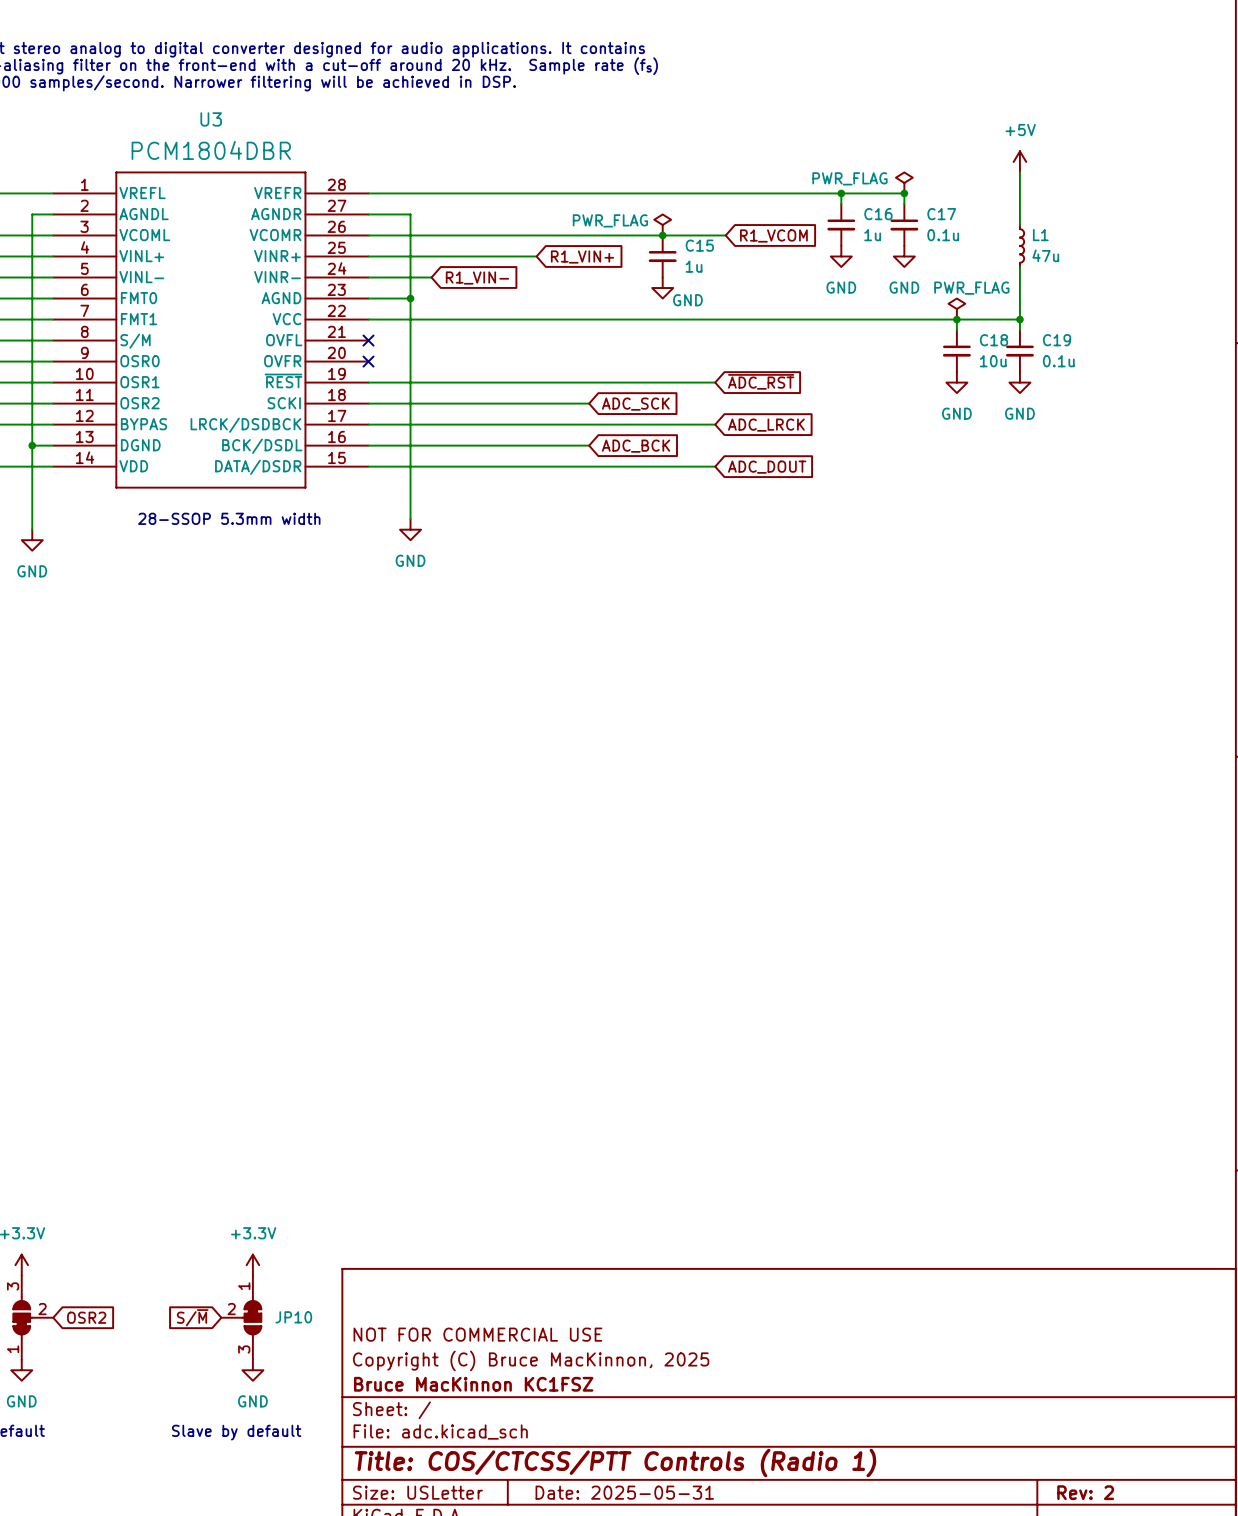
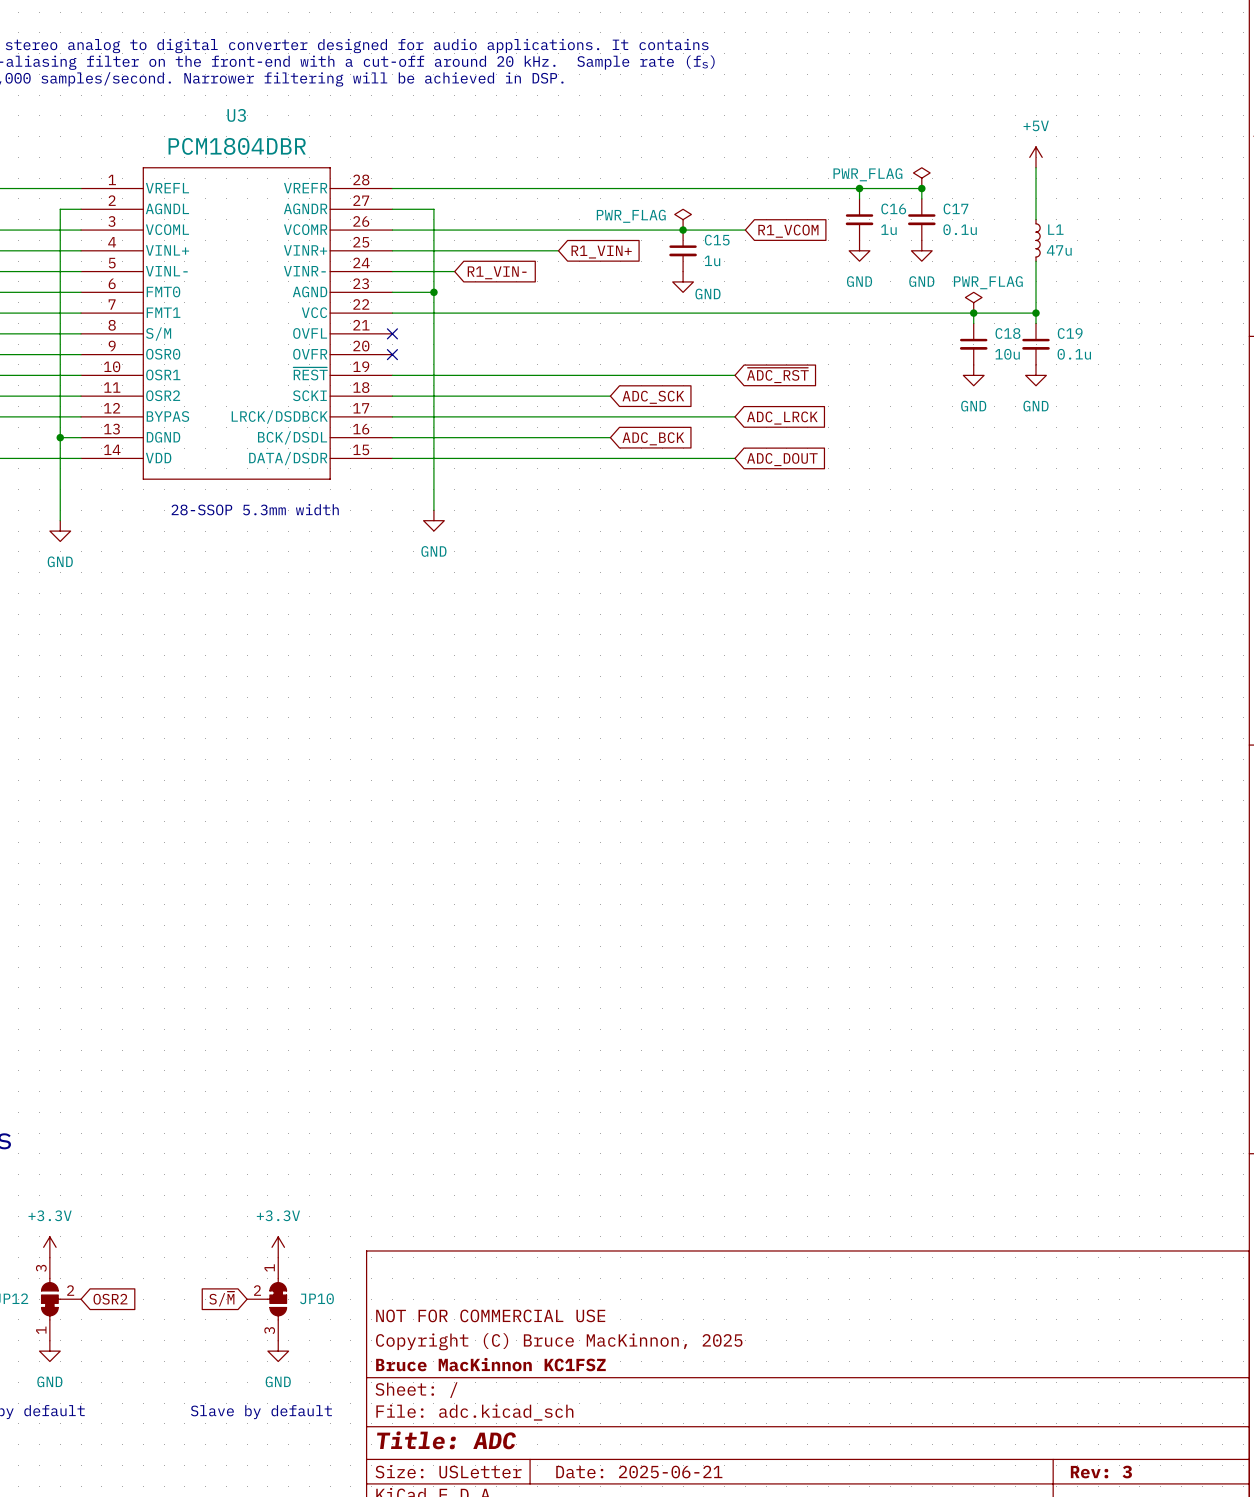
title block: Title: COS/CTCSS/PTT Controls (Radio 1) (615, 1463) -> Title: ADC (446, 1440)
title block: Date: 2025-05-31 (624, 1492) -> Date: 2025-06-21 (639, 1472)
title block: Rev: 2 (1085, 1492) -> Rev: 3 (1101, 1472)

